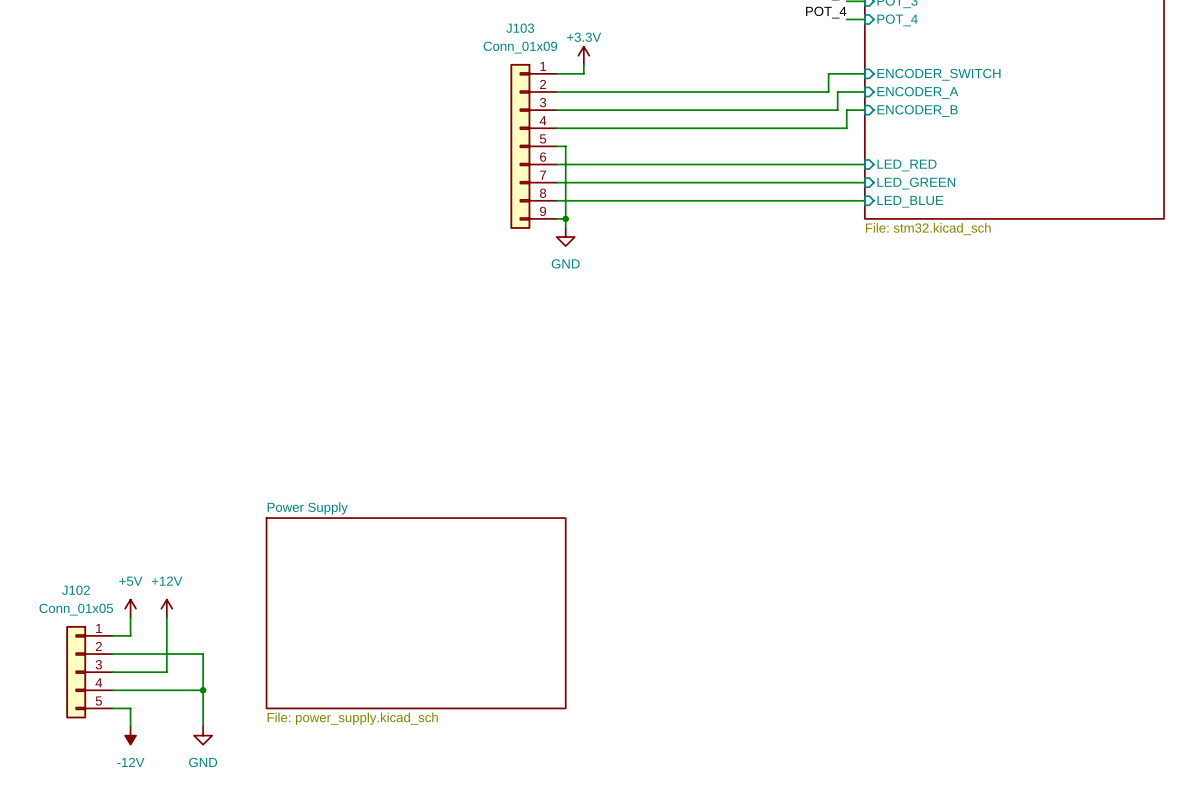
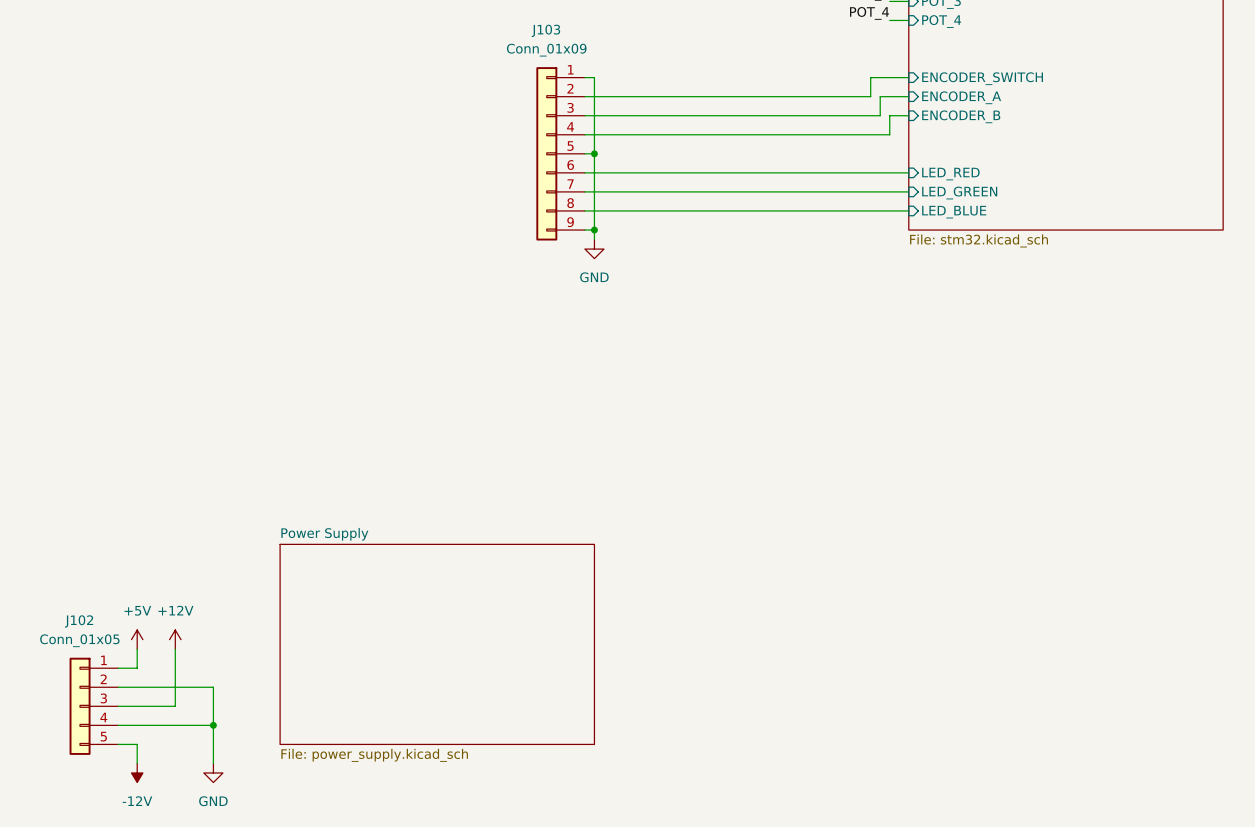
power symbol: +3.3V (583, 55) -> none
wire: (583, 64) (583, 73) (565, 73) -> (594, 153) (594, 77)
junction: none -> (594, 153)

